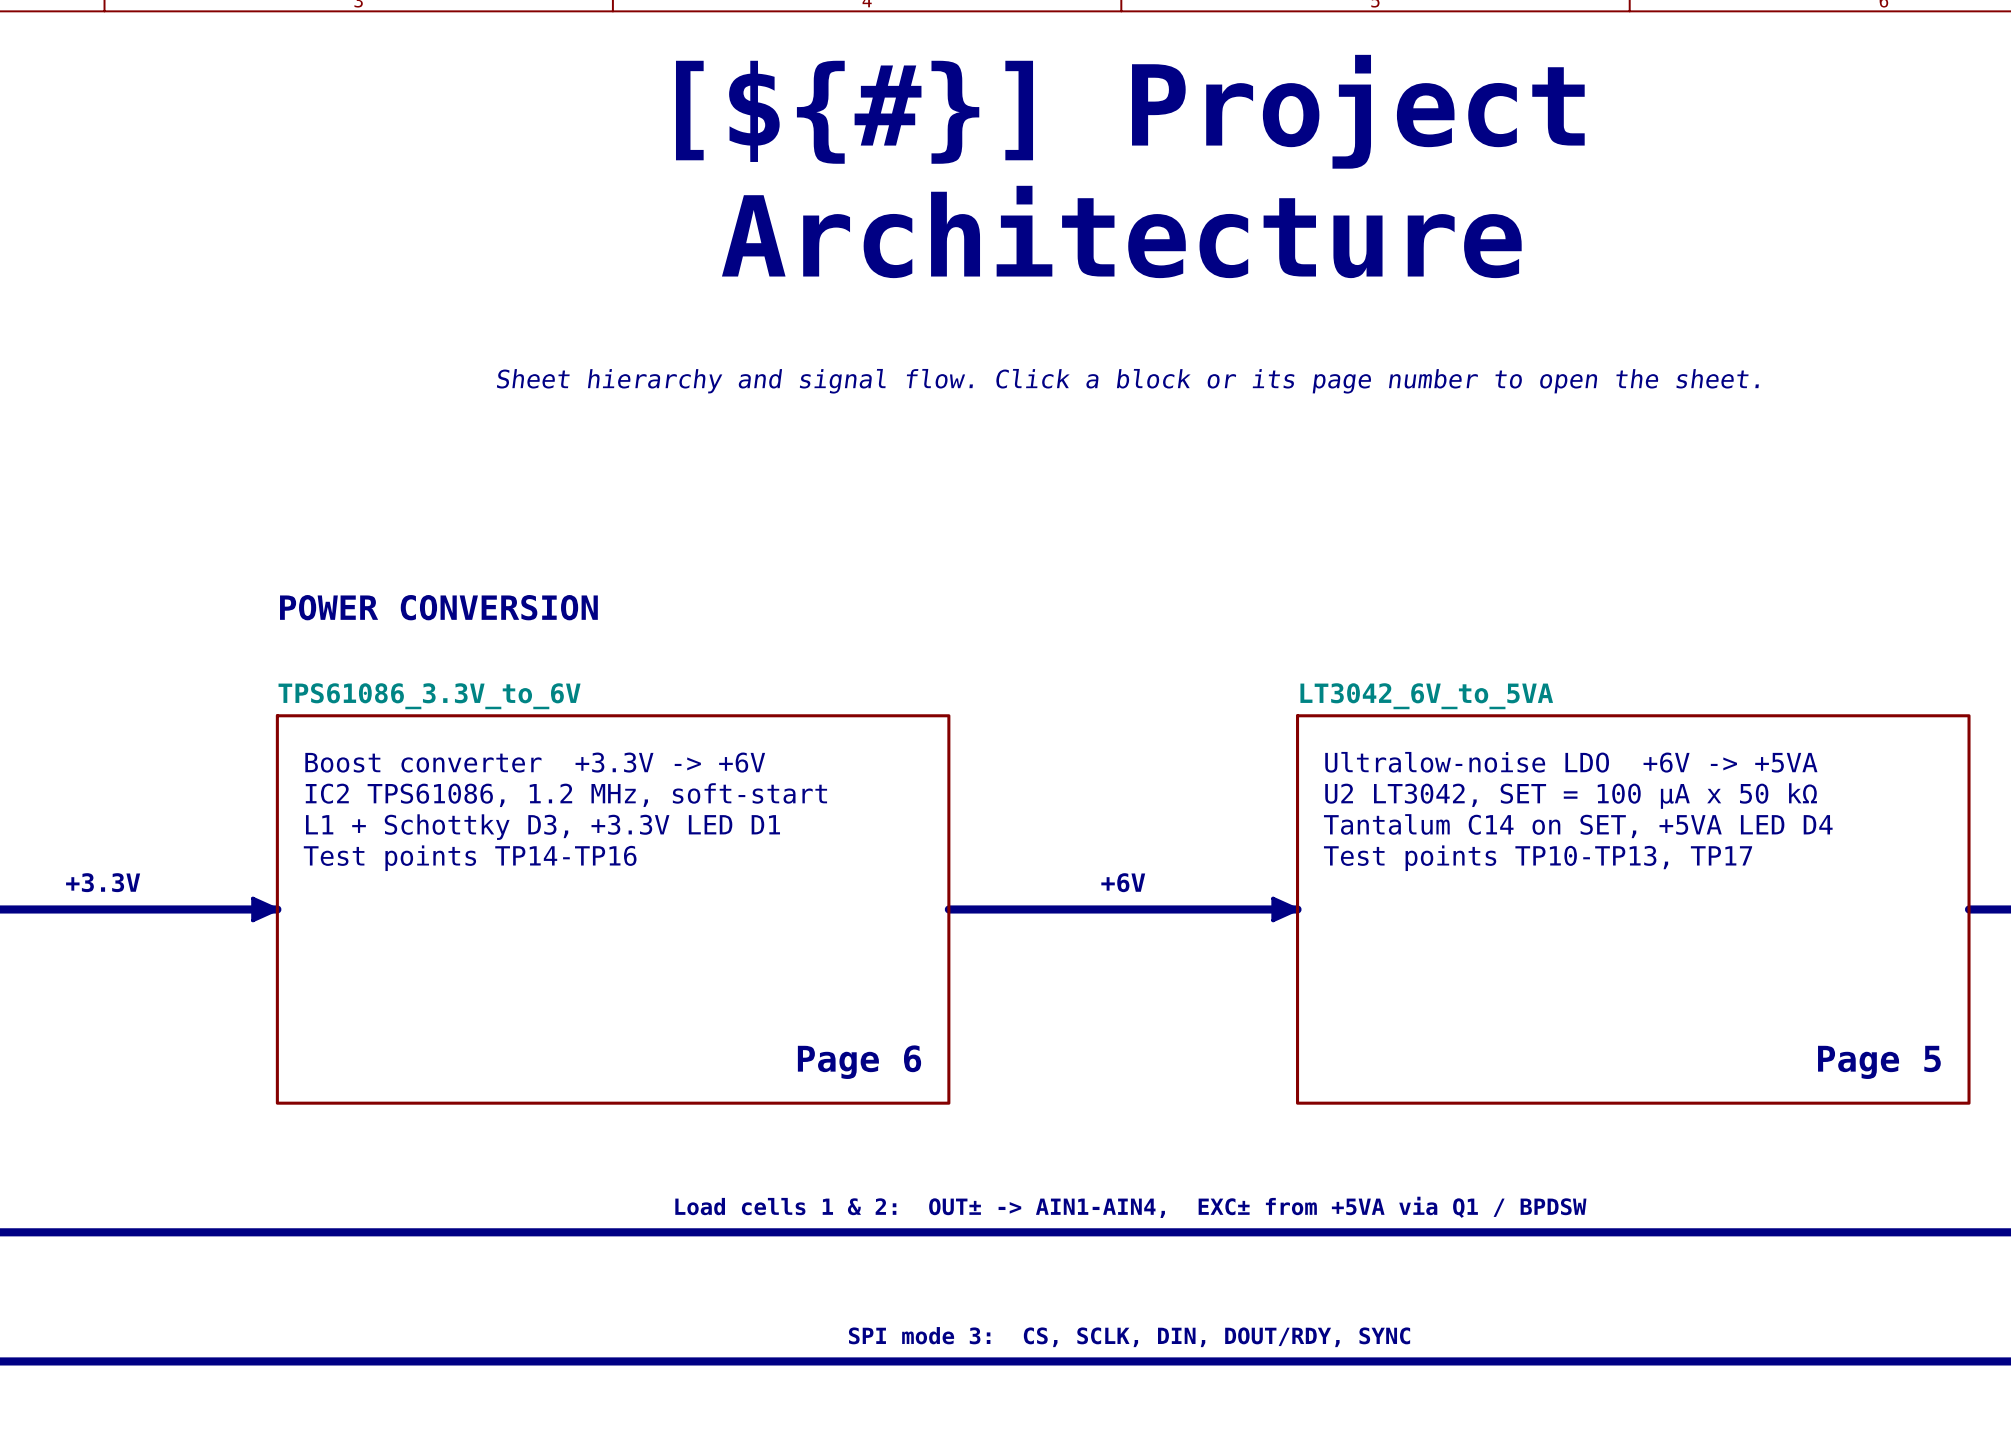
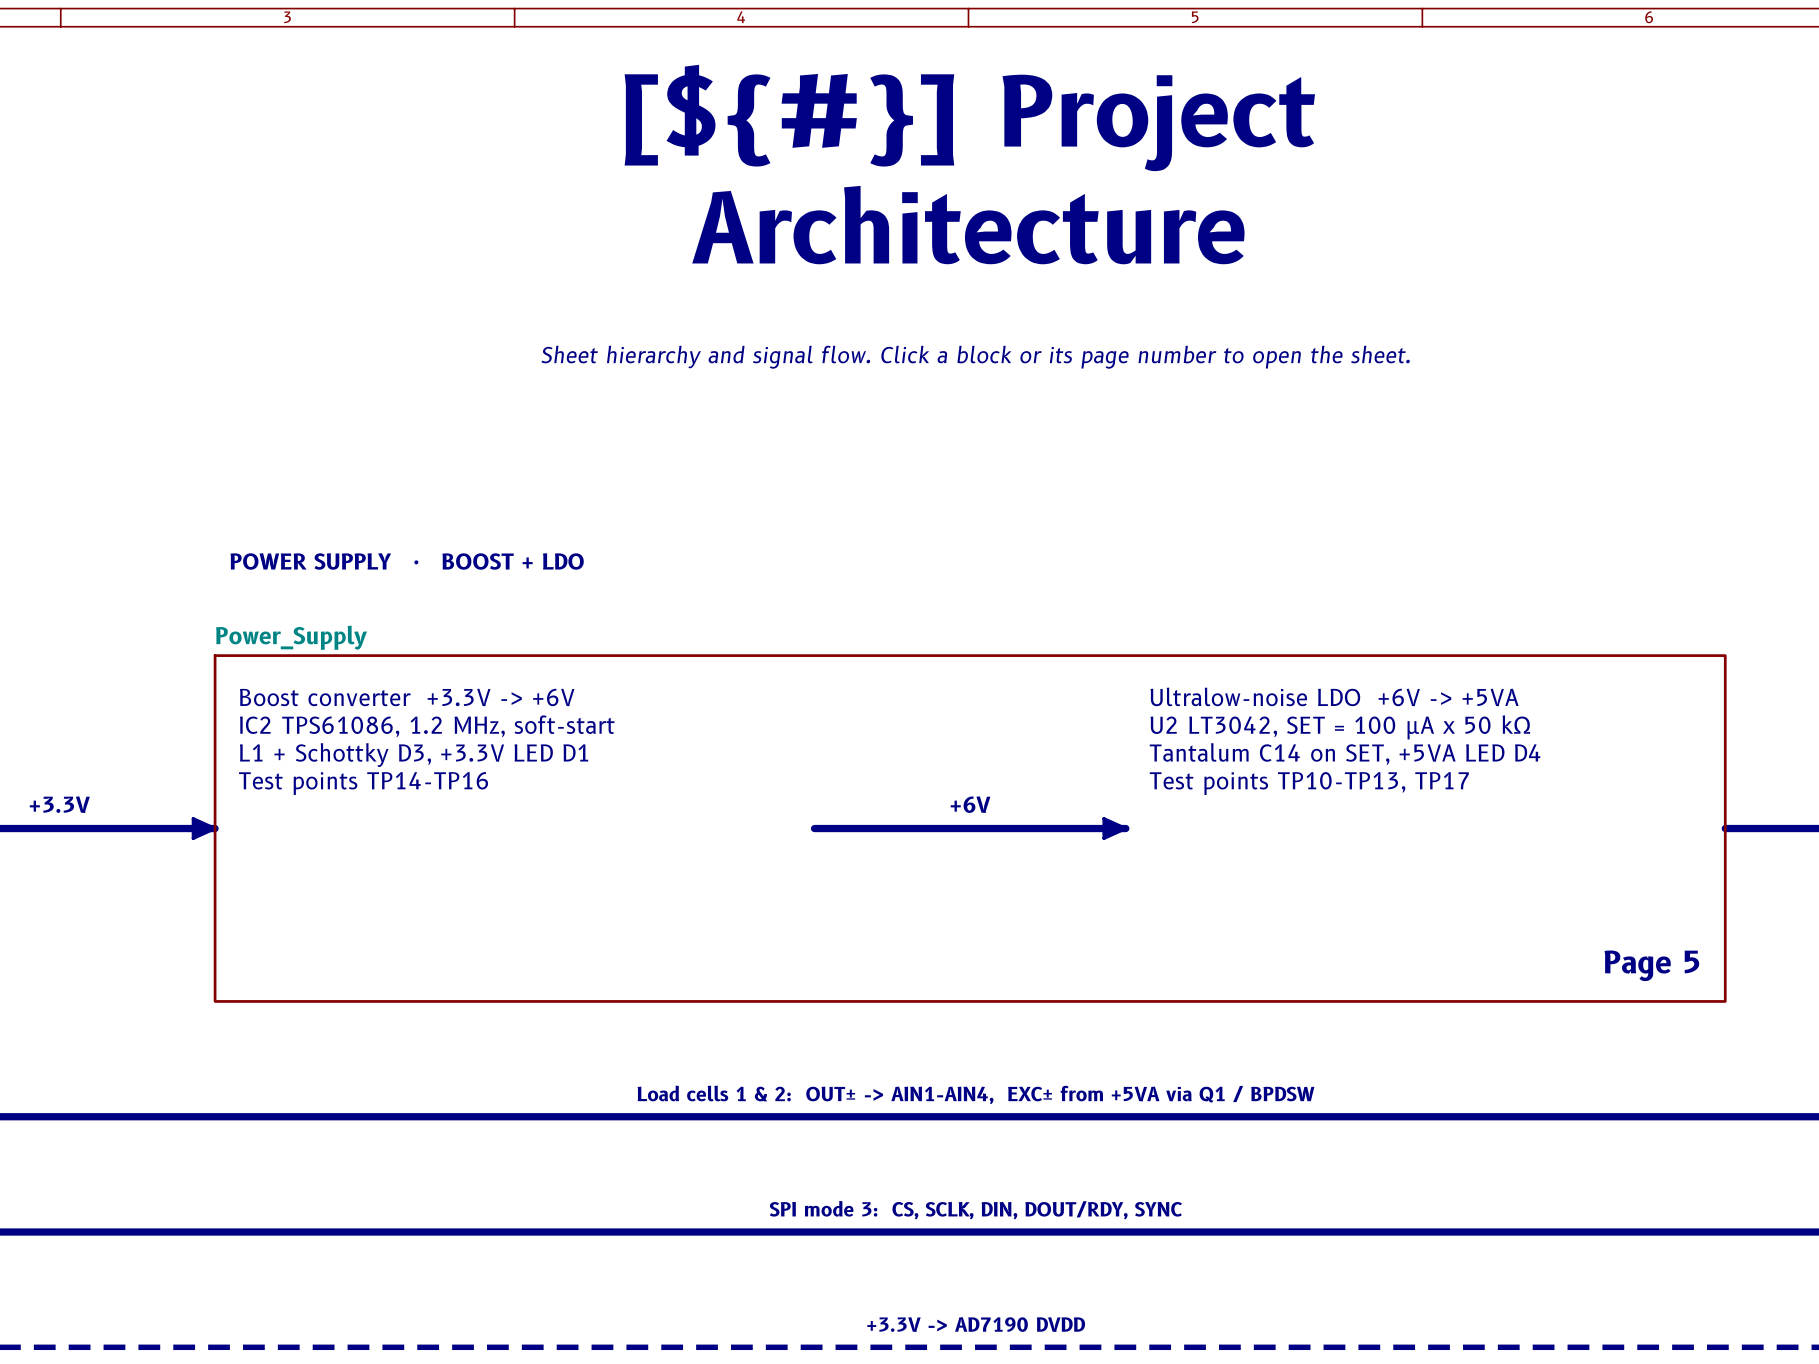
text: POWER CONVERSION (438, 607) -> none
text: none -> POWER SUPPLY · BOOST + LDO (407, 561)
sheet TPS61086_3.3V_to_6V: (613, 909) -> none
sheet Power_Supply: none -> (970, 828)
sheet LT3042_6V_to_5VA: (1633, 909) -> none
text: Page 6 (859, 1062) -> none

